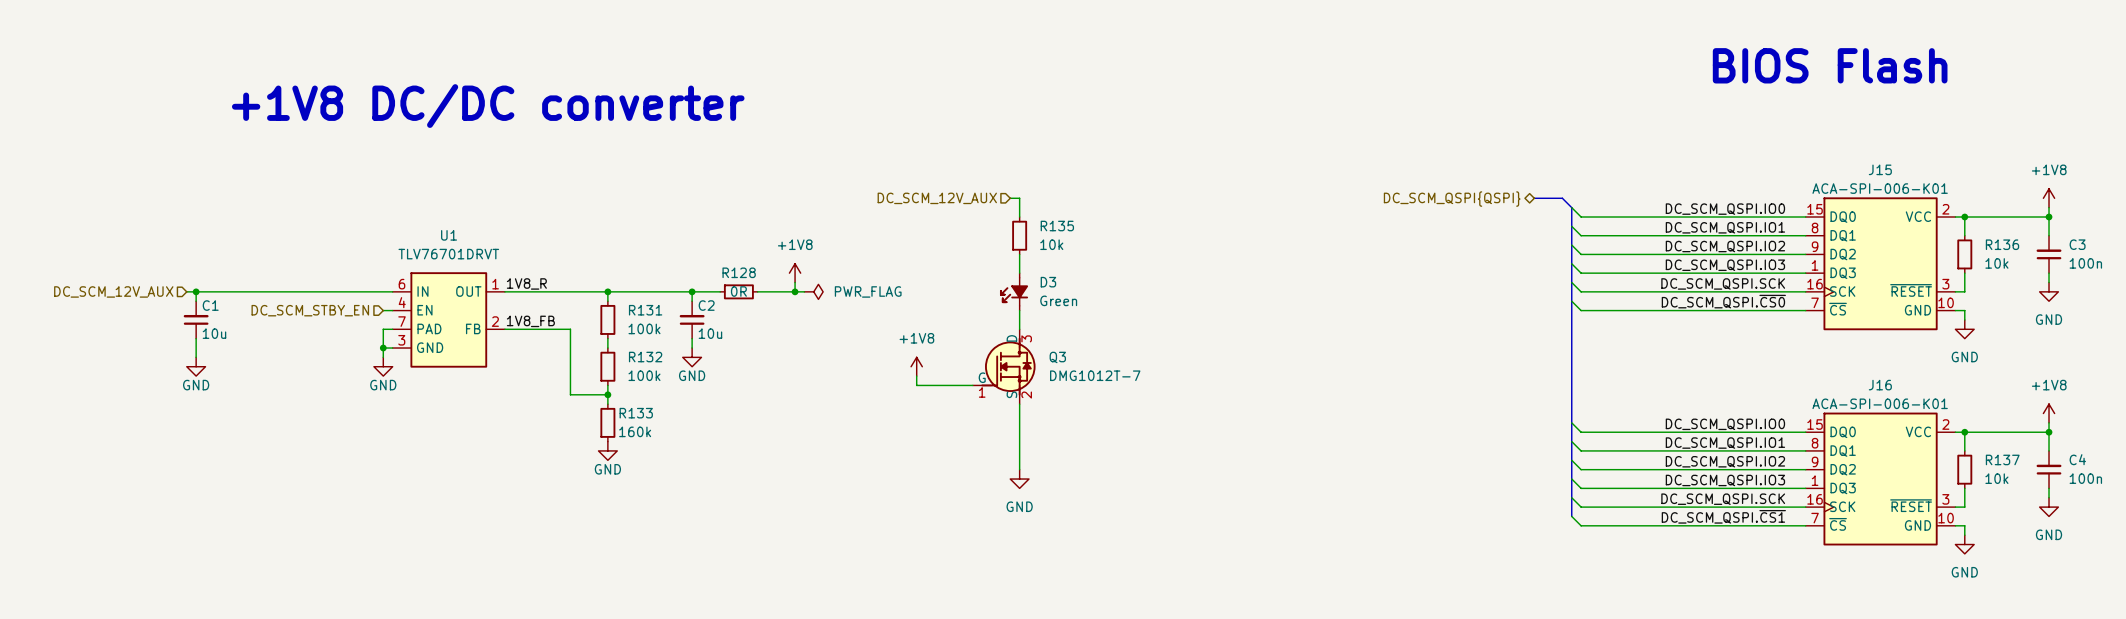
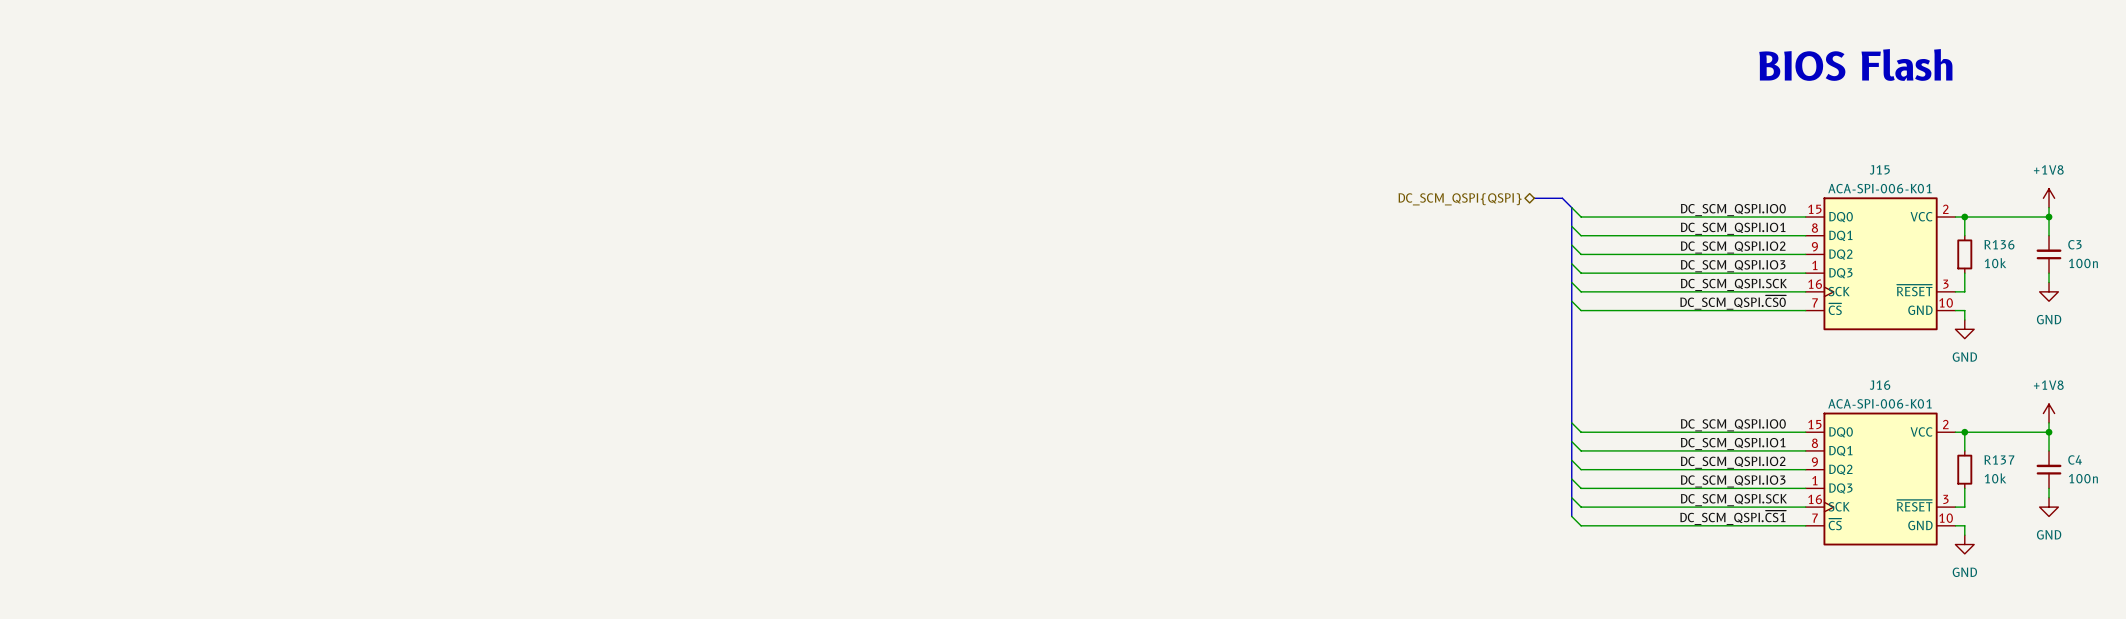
text: +1V8 DC/DC converter (488, 106) -> none
hierarchical label: DC_SCM_12V_AUX (937, 198) -> none
wire: (1010, 198) (1019, 198) (1019, 217) -> none
R135: (1019, 235) -> none
wire: (1019, 254) (1019, 273) -> none
power symbol: +1V8 (795, 273) -> none
wire: (795, 282) (795, 291) -> none
label: 1V8_R (526, 283) -> none
hierarchical label: DC_SCM_12V_AUX (113, 291) -> none
wire: (186, 291) (392, 291) -> none
wire: (196, 291) (196, 301) -> none
junction: (196, 291) -> none
wire: (504, 291) (720, 291) -> none
wire: (607, 291) (607, 301) -> none
junction: (607, 291) -> none
wire: (692, 291) (692, 301) -> none
junction: (692, 291) -> none
R128: (738, 291) -> none
wire: (757, 291) (804, 291) -> none
junction: (795, 291) -> none
power symbol: PWR_FLAG (813, 291) -> none
D3: (1014, 291) -> none
hierarchical label: DC_SCM_STBY_EN (310, 310) -> none
wire: (383, 310) (392, 310) -> none
wire: (1019, 310) (1019, 329) -> none
C1: (196, 319) -> none
U1: (448, 319) -> none
R131: (607, 319) -> none
C2: (692, 319) -> none
label: 1V8_FB (530, 321) -> none
wire: (392, 329) (383, 329) (383, 357) -> none
wire: (504, 329) (570, 329) (570, 394) (607, 394) -> none
wire: (196, 338) (196, 357) -> none
wire: (607, 338) (607, 348) -> none
wire: (692, 338) (692, 348) -> none
wire: (383, 348) (392, 348) -> none
junction: (383, 348) -> none
power symbol: GND (692, 357) -> none
power symbol: GND (196, 366) -> none
power symbol: GND (383, 366) -> none
R132: (607, 366) -> none
power symbol: +1V8 (916, 366) -> none
Q3: (1004, 366) -> none
wire: (916, 376) (916, 385) (972, 385) -> none
wire: (607, 385) (607, 404) -> none
junction: (607, 394) -> none
wire: (1019, 404) (1019, 469) -> none
R133: (607, 422) -> none
power symbol: GND (607, 450) -> none
power symbol: GND (1019, 479) -> none

